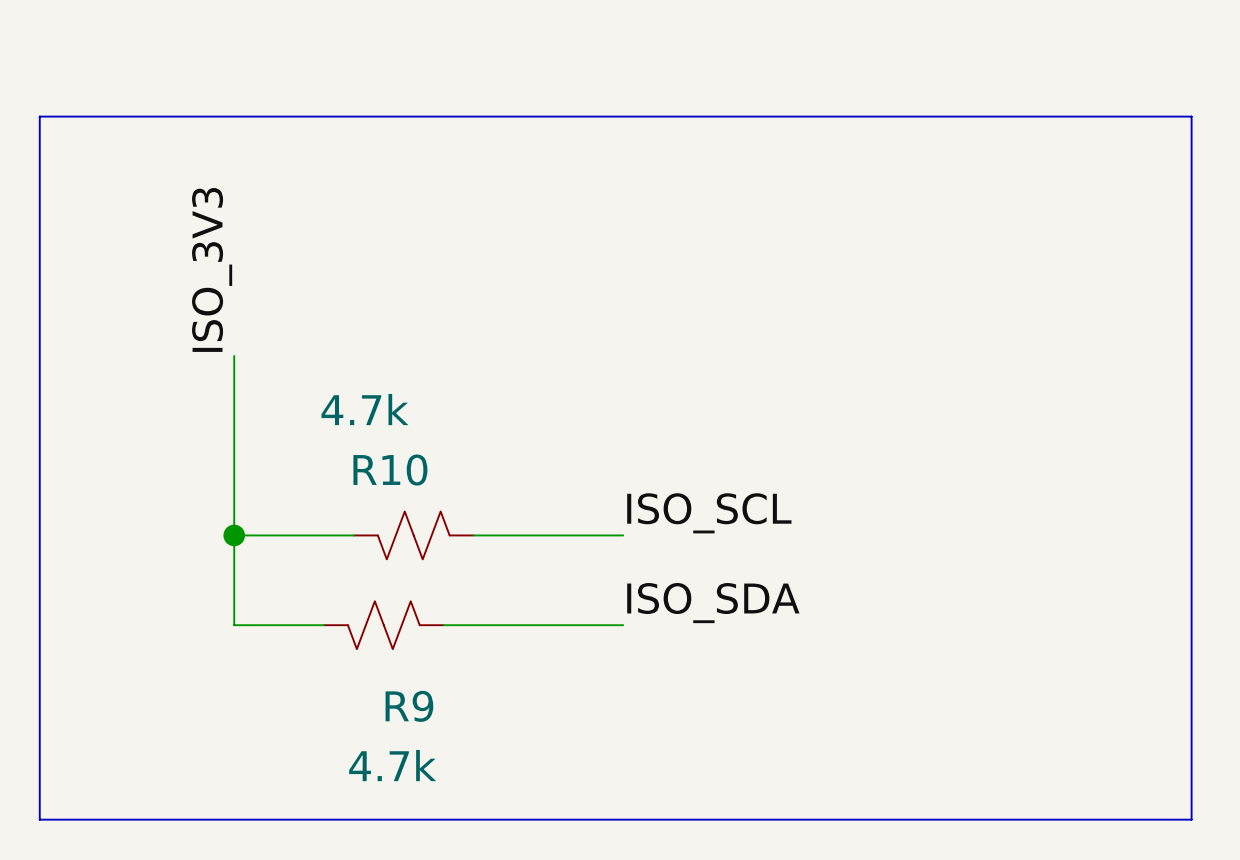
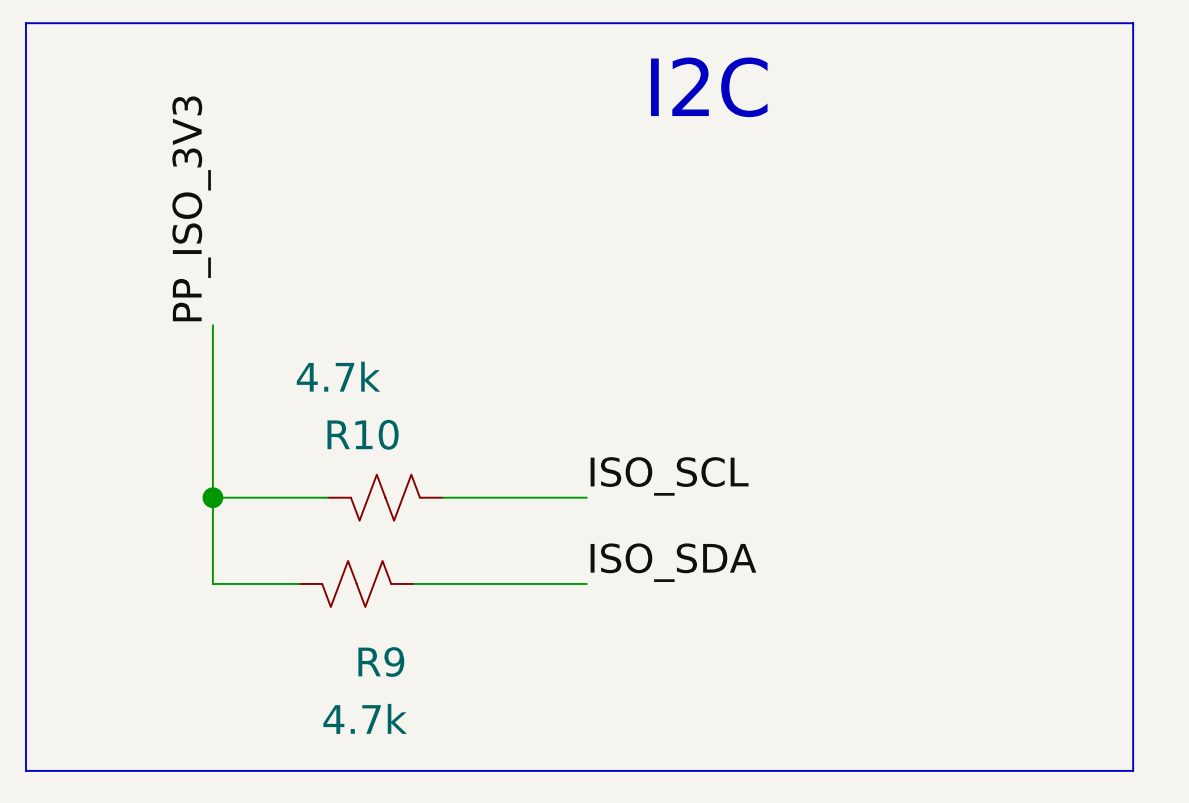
text: none -> I2C (709, 87)
line: (39, 116) (1191, 116) -> (25, 95) (25, 23) (1133, 23) (1133, 95)
label: ISO_3V3 (212, 269) -> PP_ISO_3V3 (191, 208)

